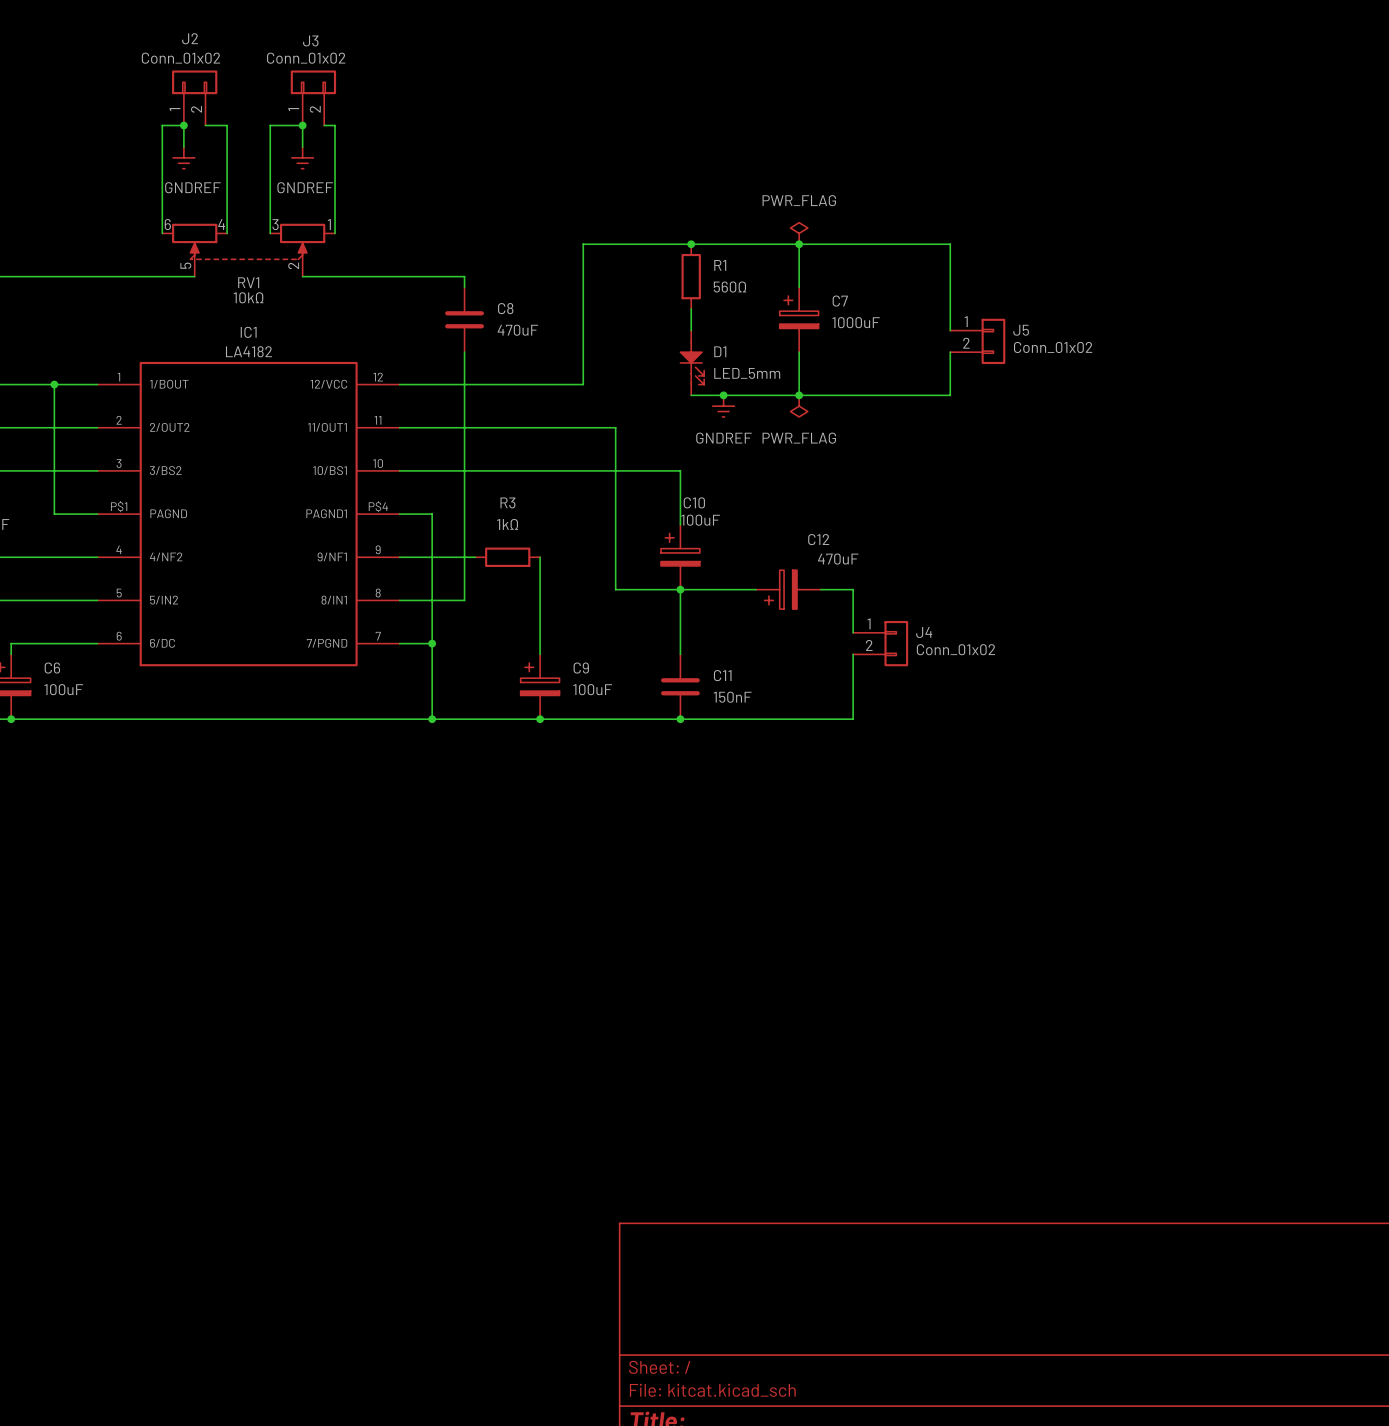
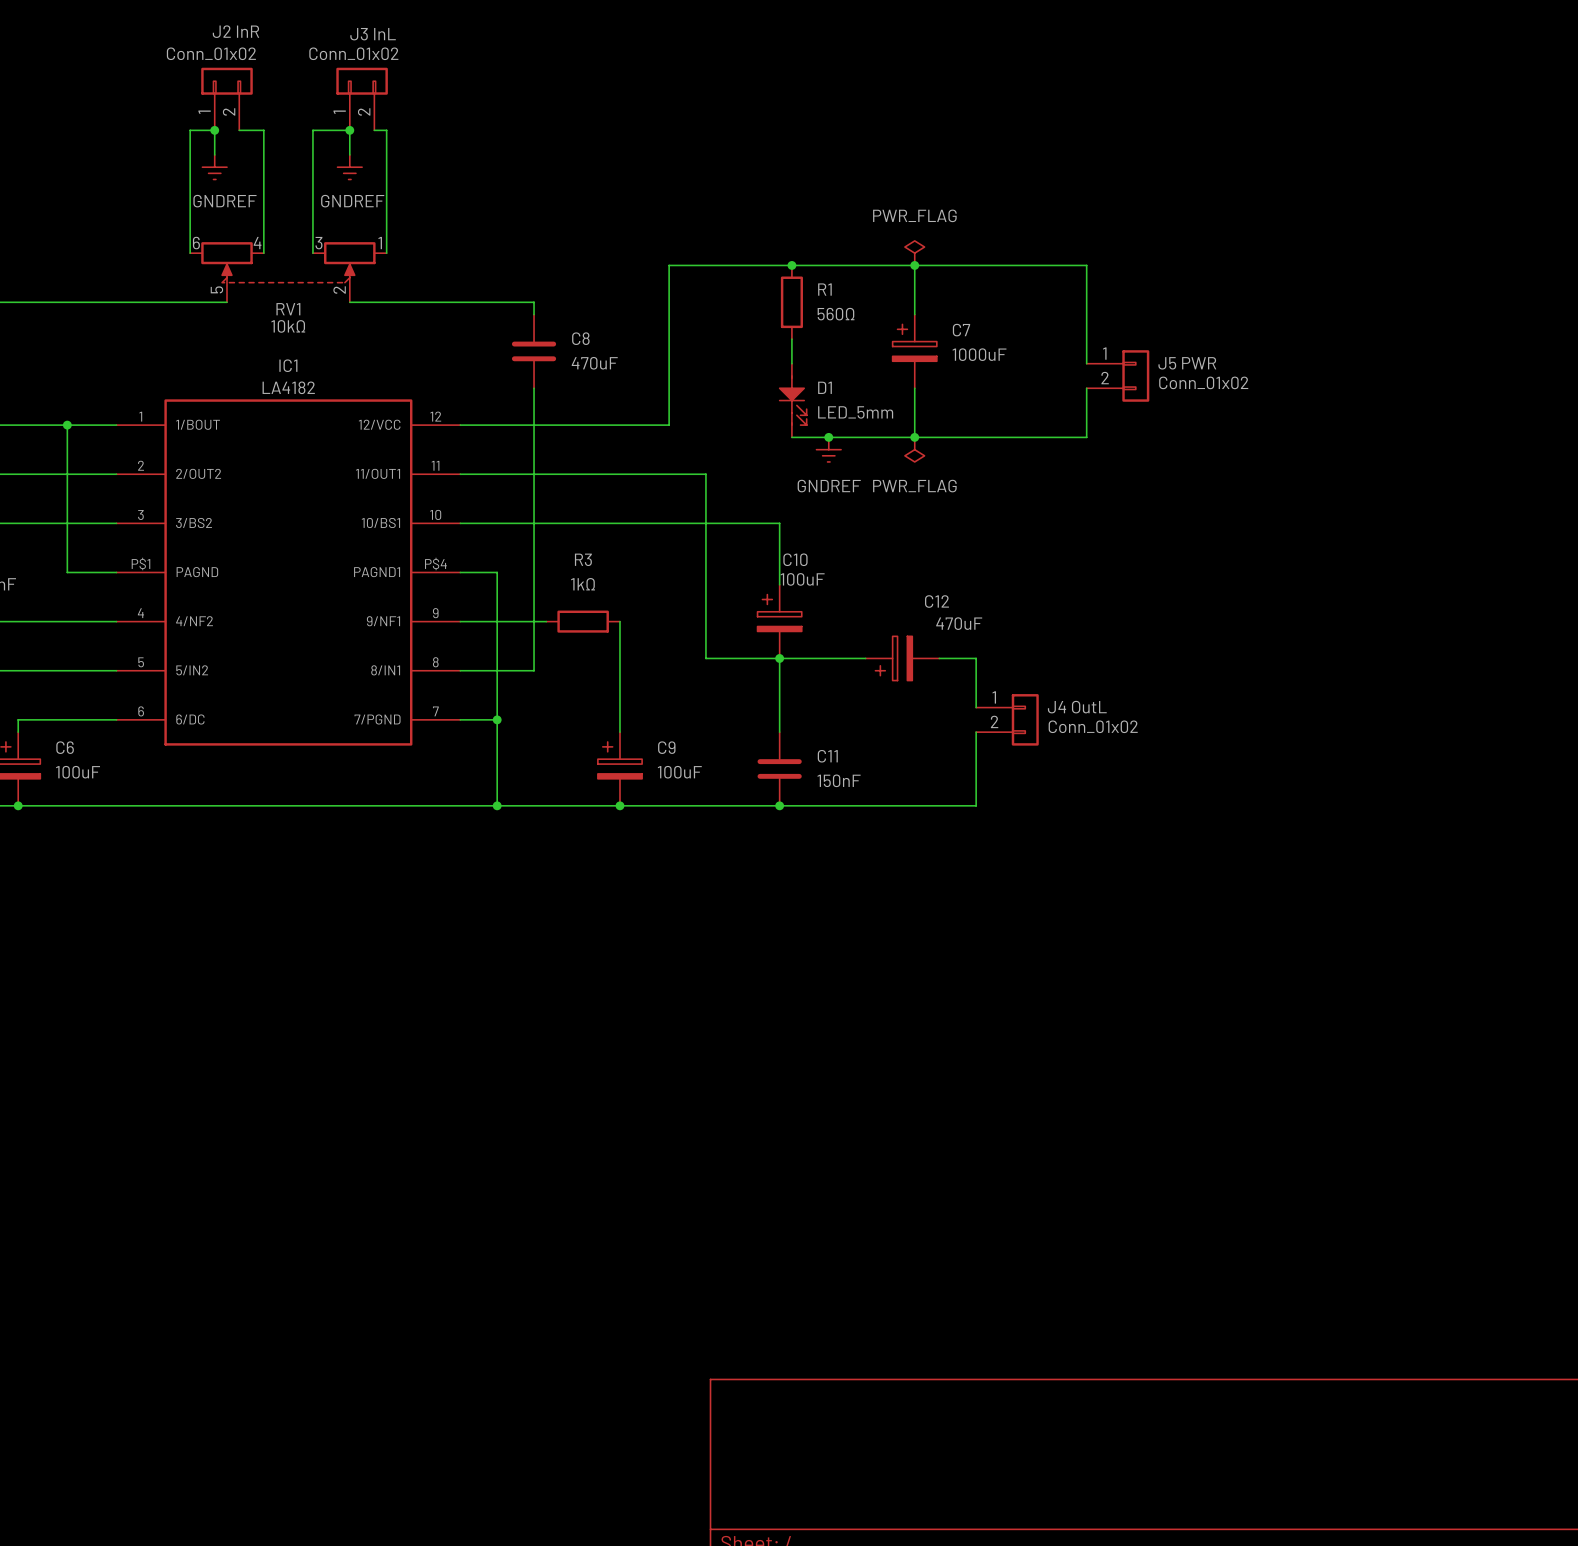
J2 name: J2 (190, 38) -> J2 InR (235, 31)
J3 name: J3 (310, 40) -> J3 InL (373, 34)
J5 name: J5 (1021, 330) -> J5 PWR (1187, 363)
J4 name: J4 (924, 632) -> J4 OutL (1077, 707)

